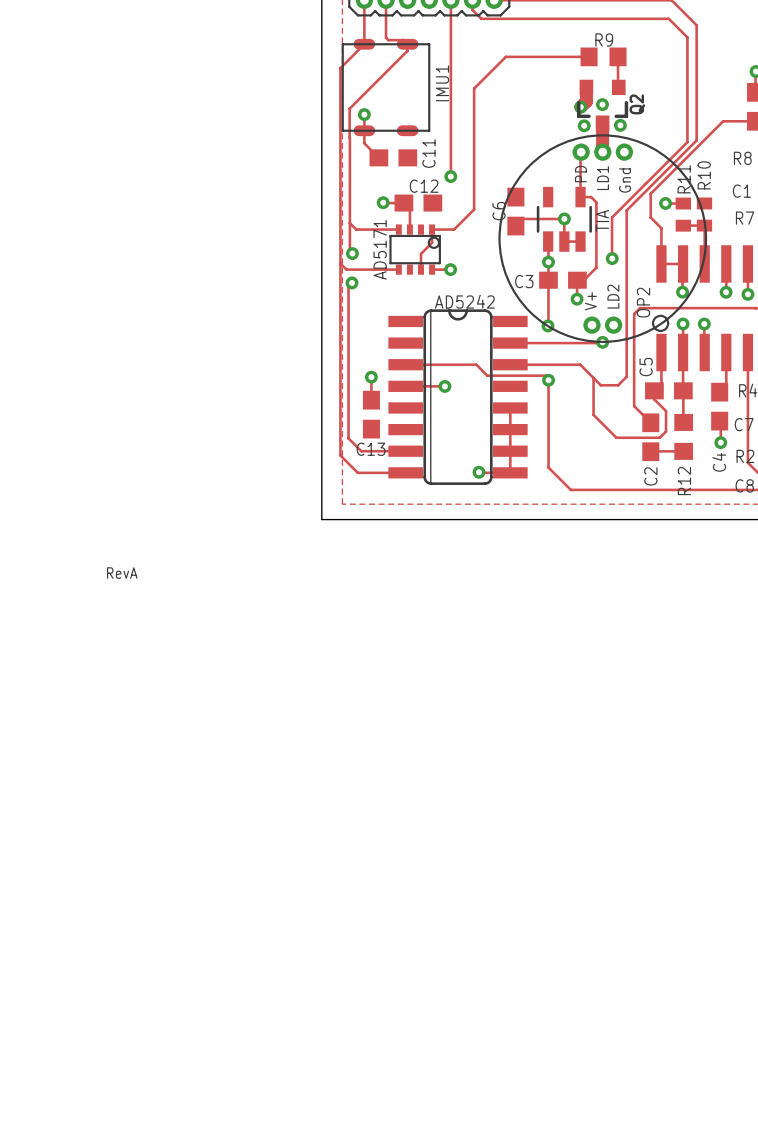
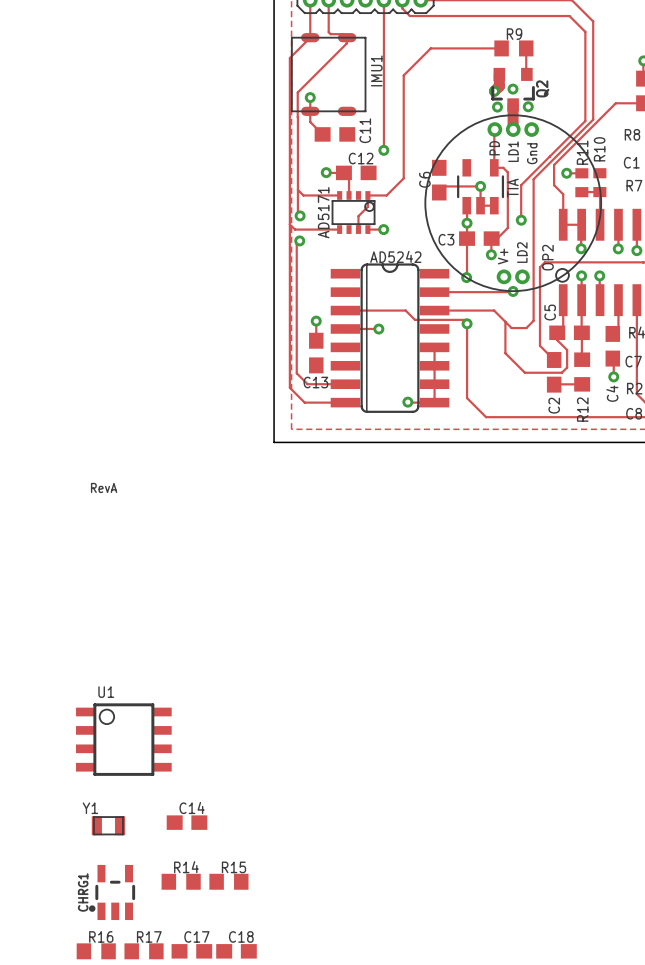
U1: none -> (123, 739)
C14: none -> (187, 822)
Y1: none -> (108, 825)
R14: none -> (181, 881)
R15: none -> (228, 881)
CHRG1: none -> (112, 892)
R16: none -> (96, 951)
R17: none -> (144, 951)
C17: none -> (191, 951)
C18: none -> (236, 951)

